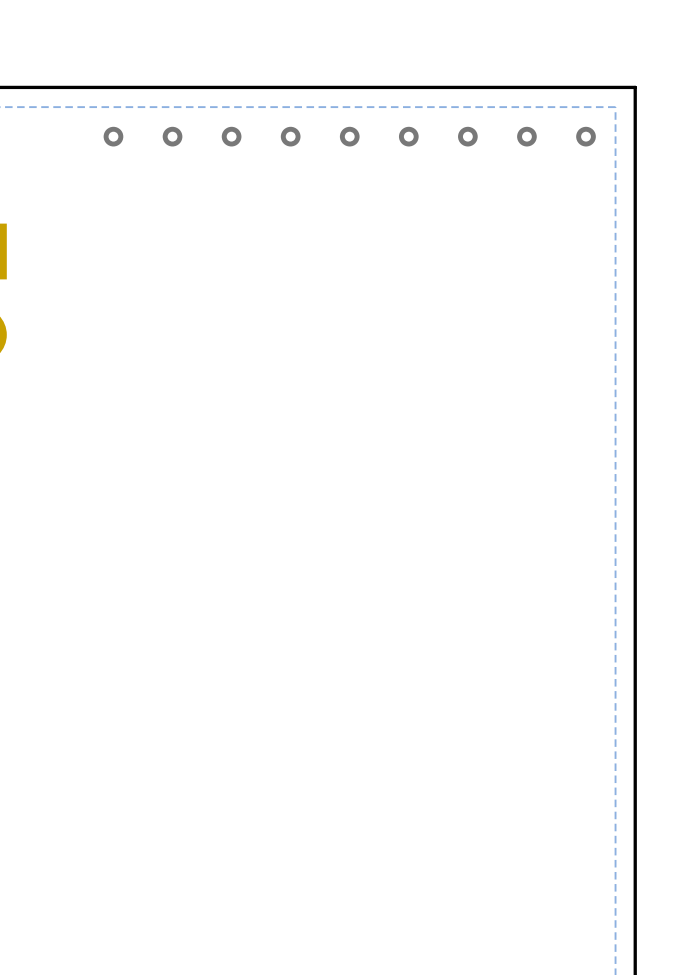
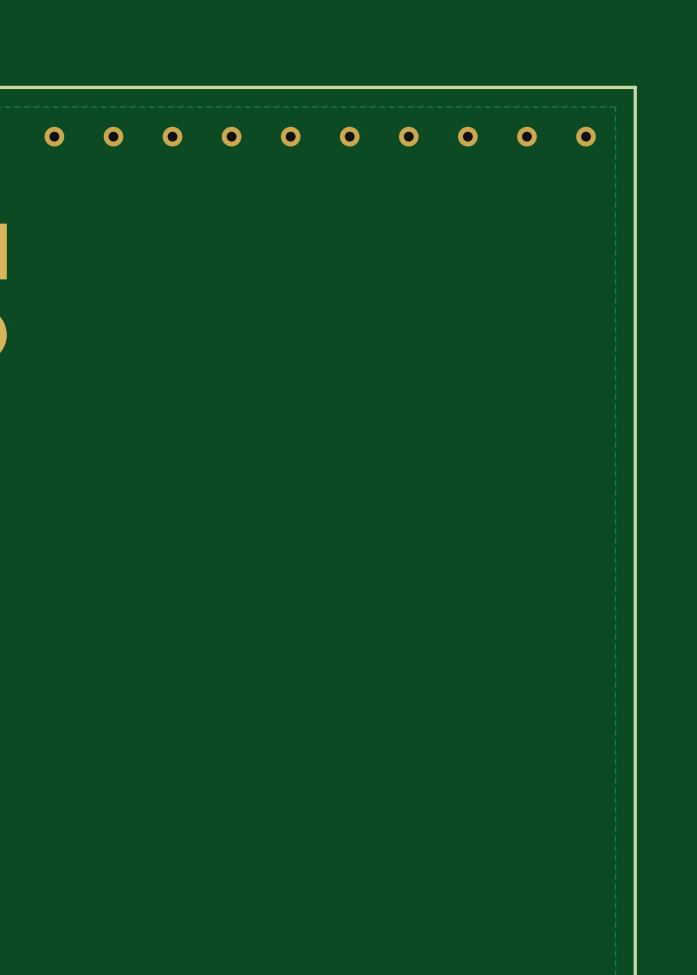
via: none -> (54, 136)

